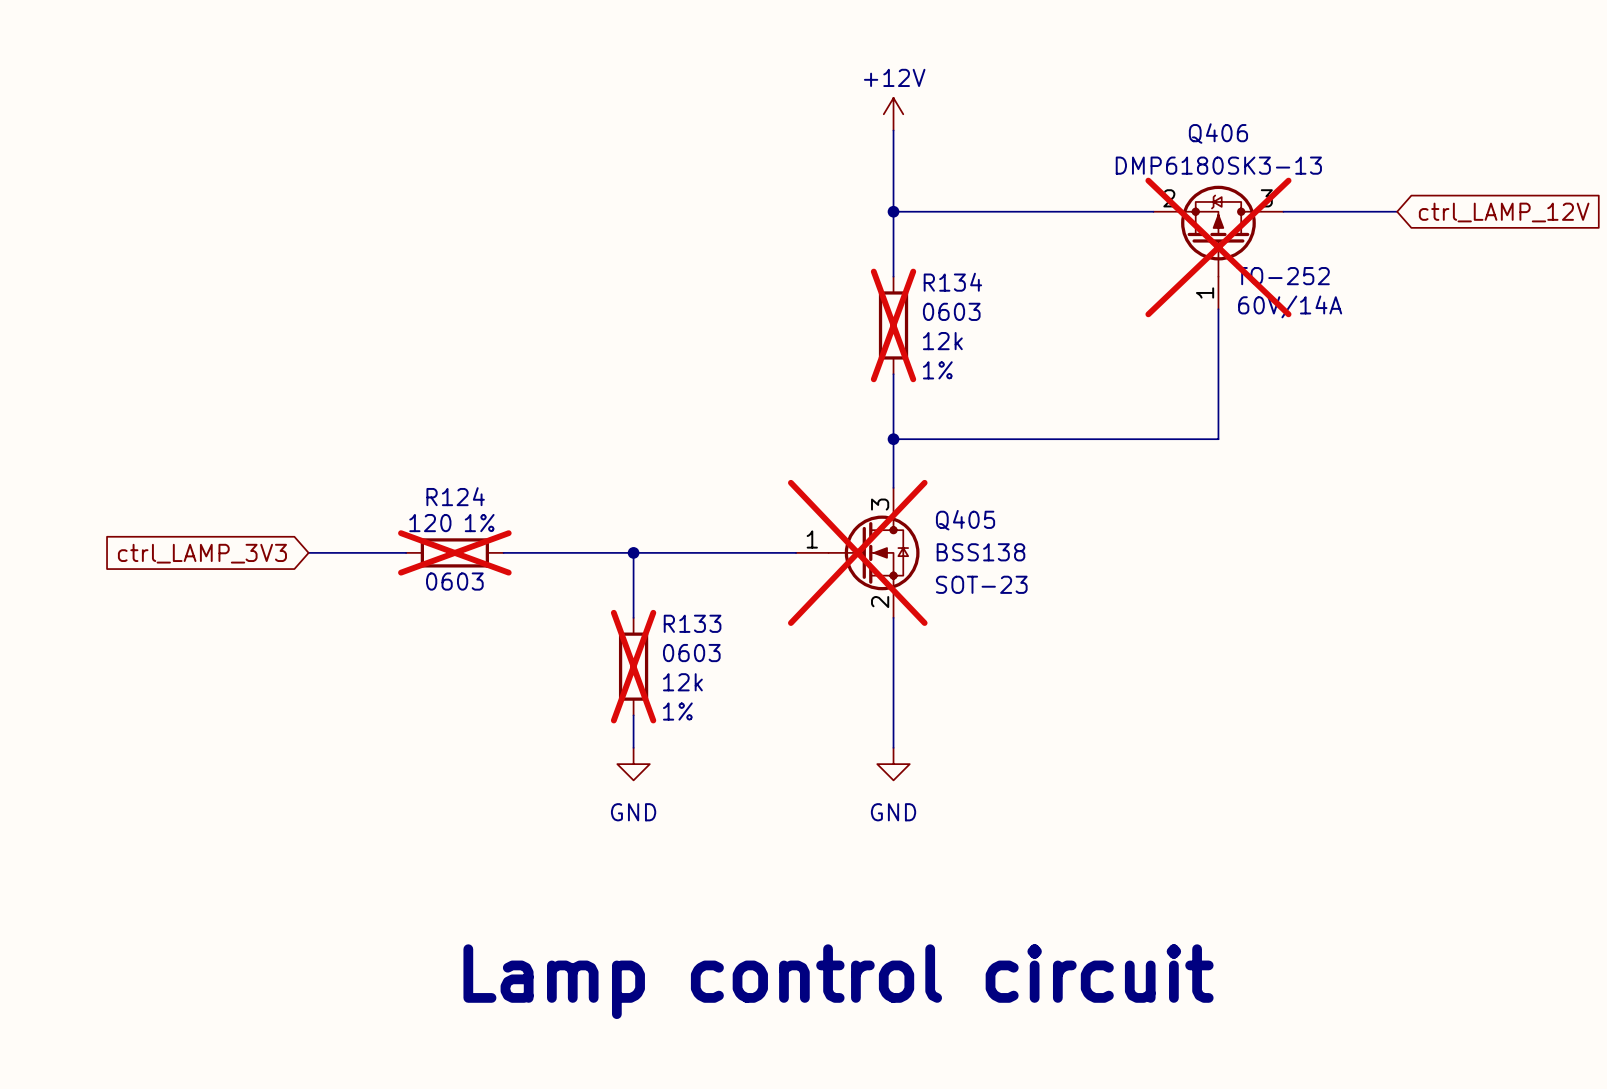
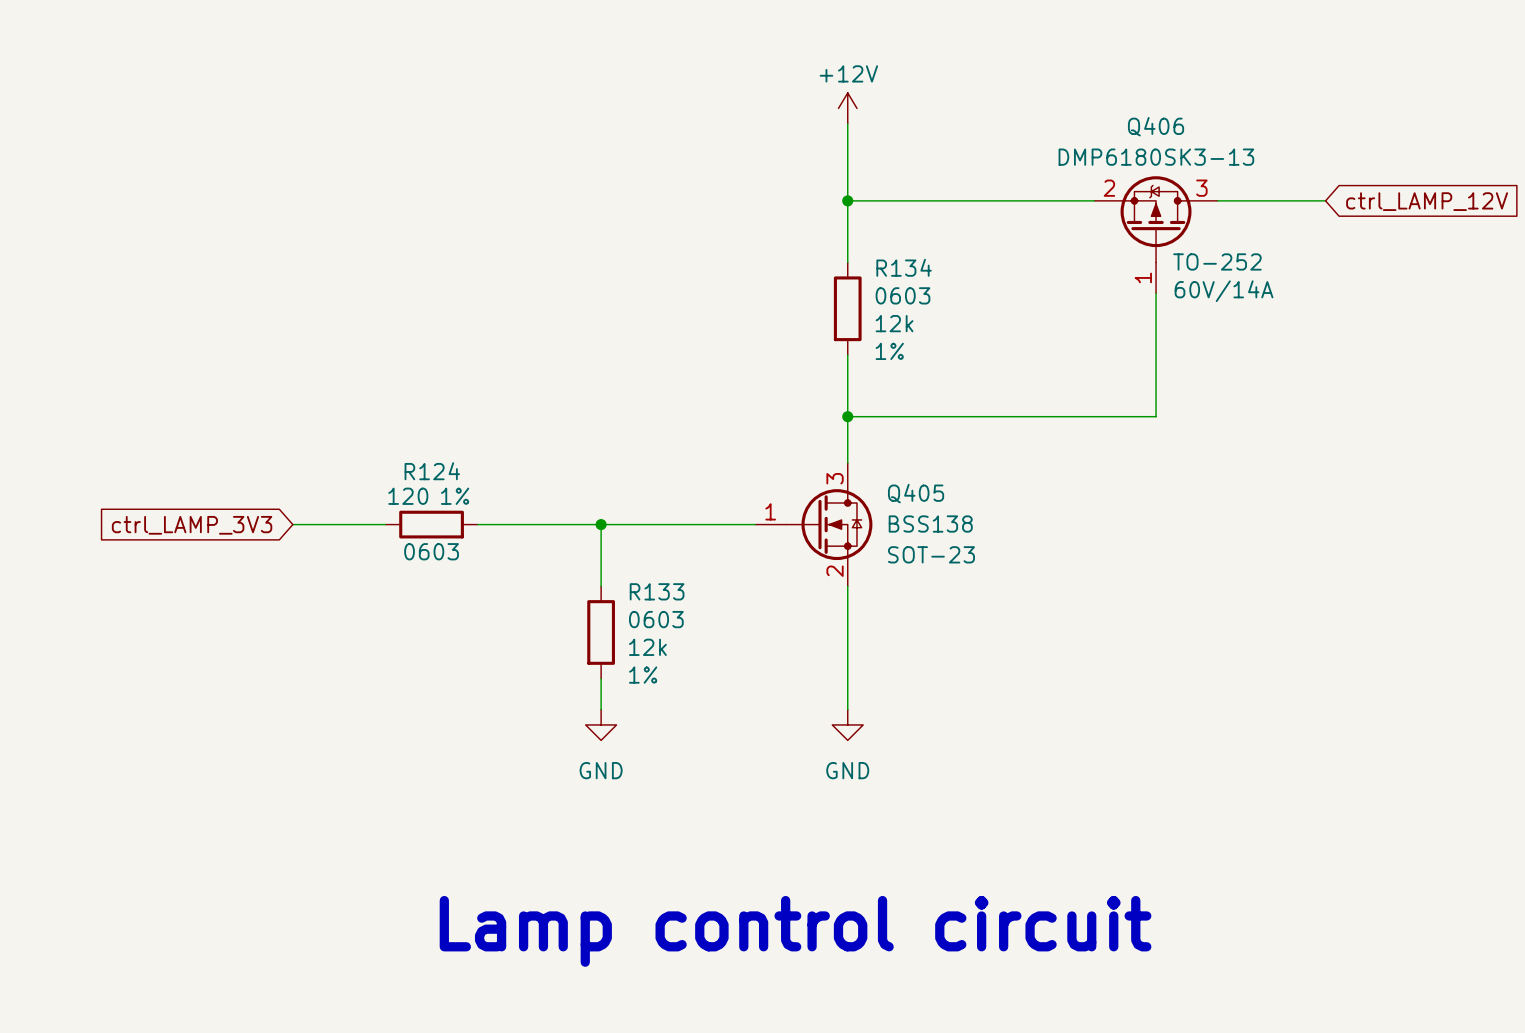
Q406 do-not-place cross: (1218, 247) -> none
R134 do-not-place cross: (893, 325) -> none
R124 do-not-place cross: (454, 552) -> none
Q405 do-not-place cross: (857, 552) -> none
R133 do-not-place cross: (633, 666) -> none

